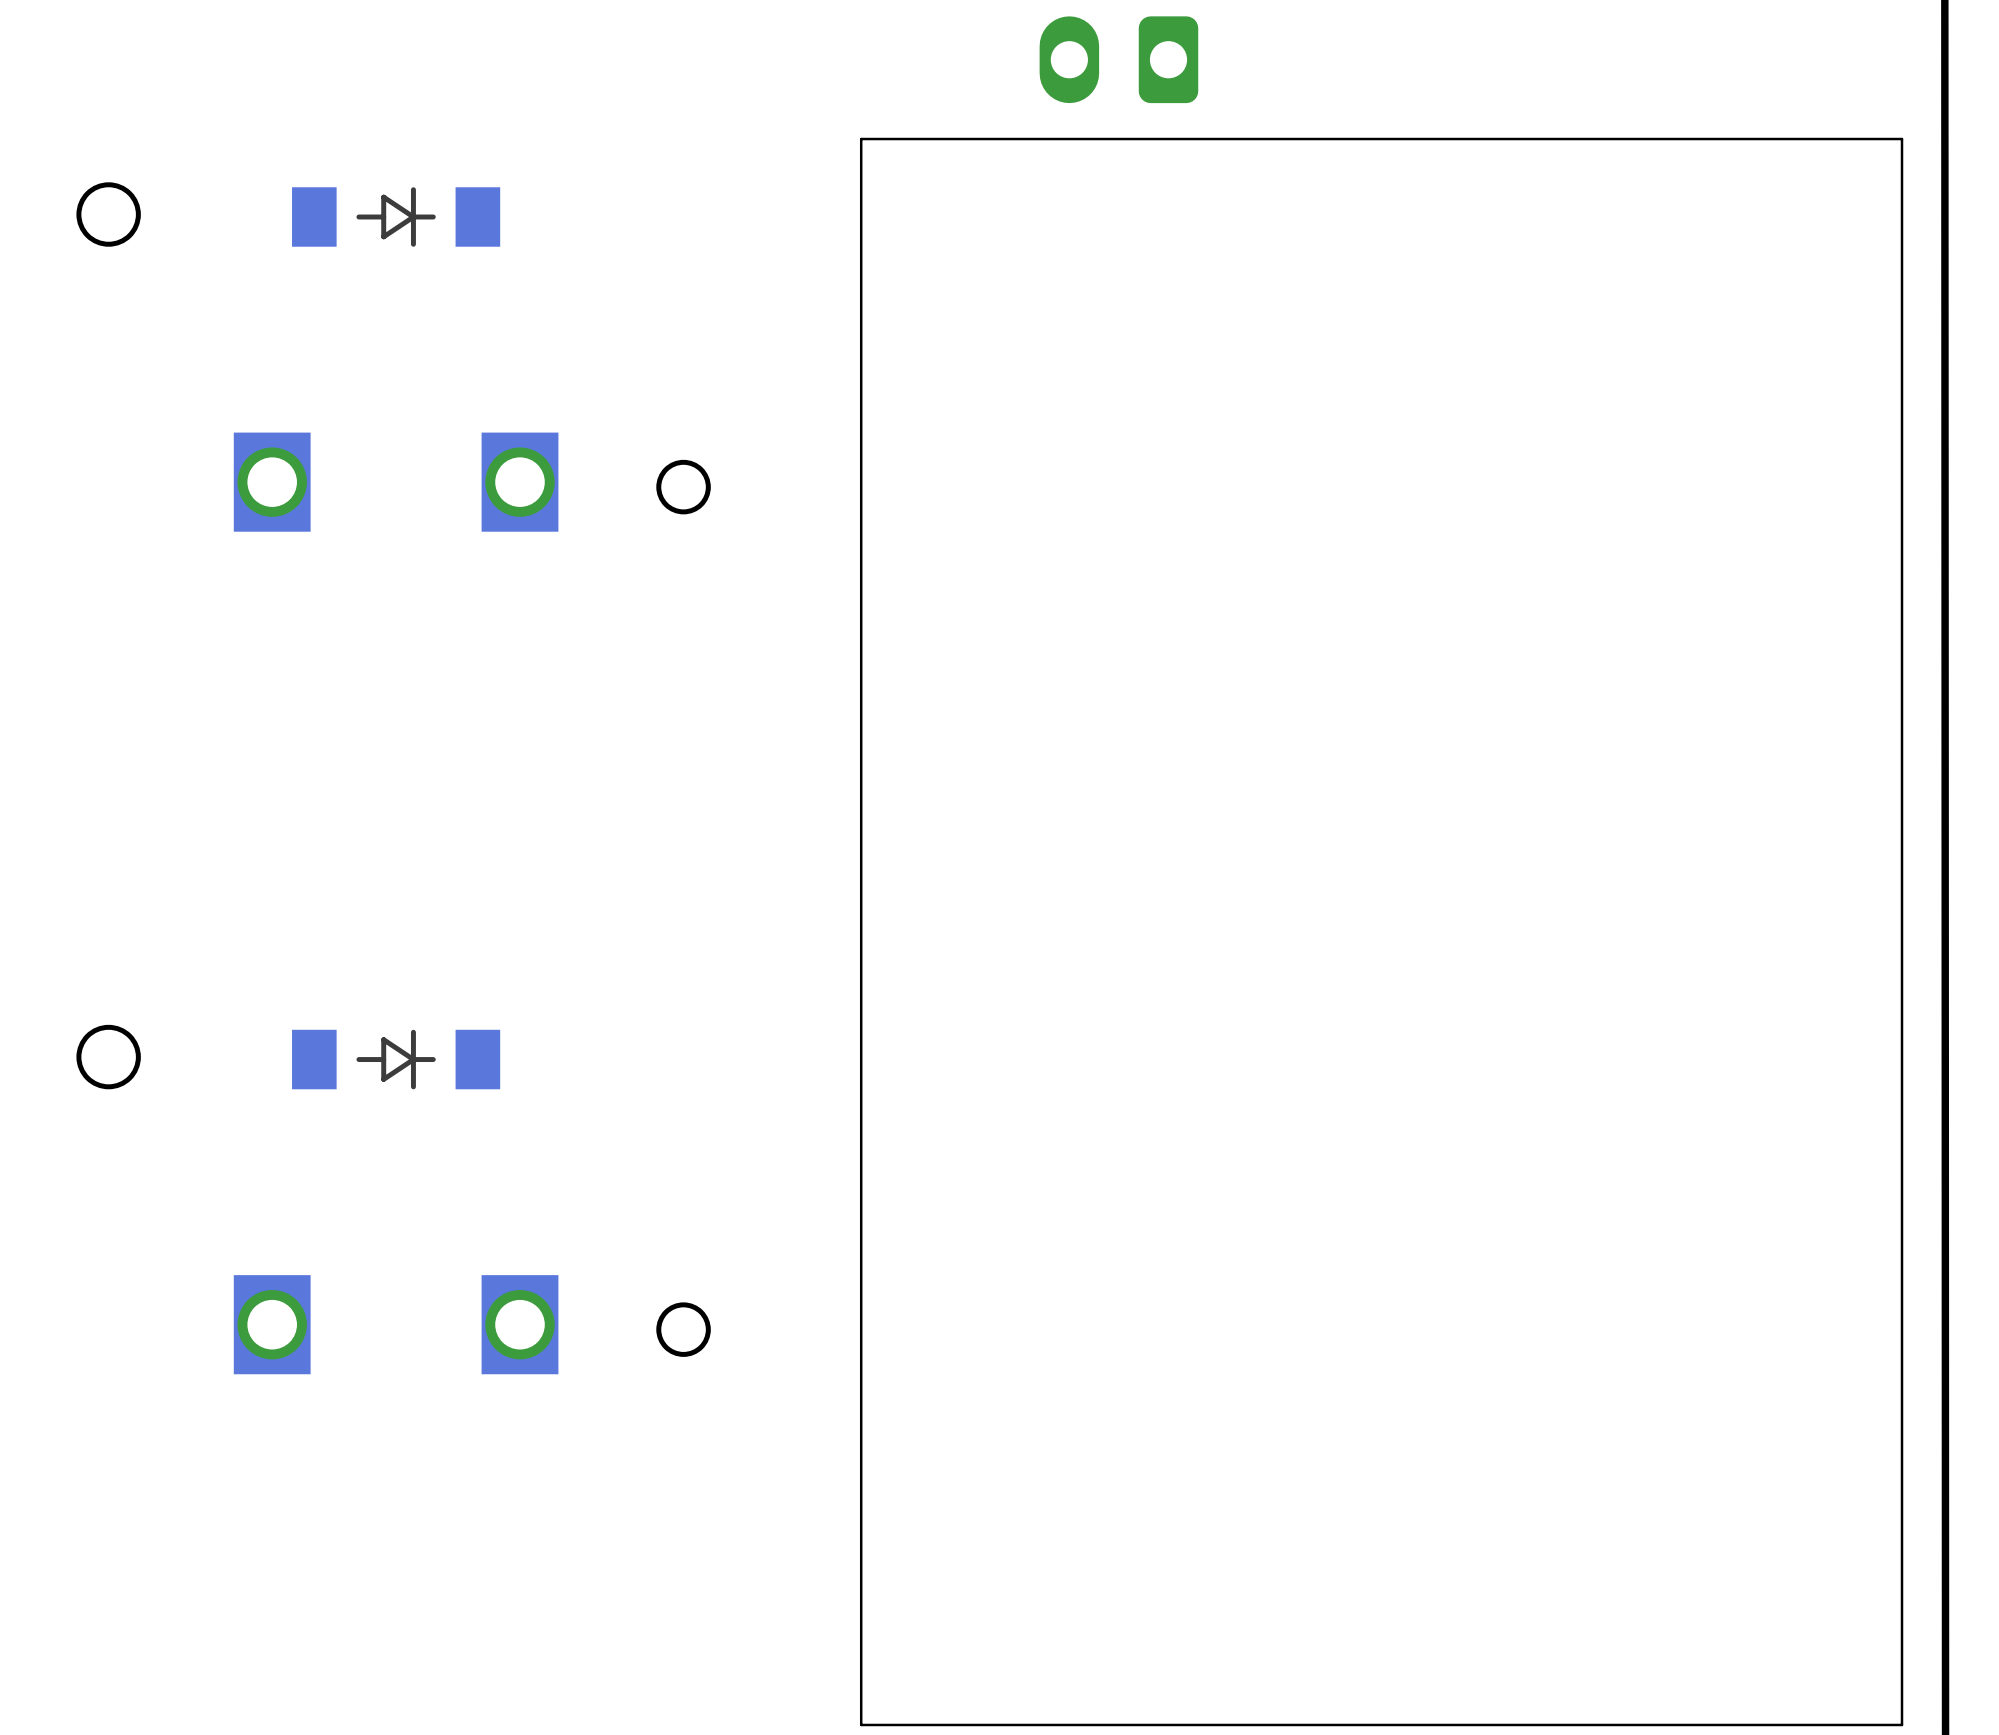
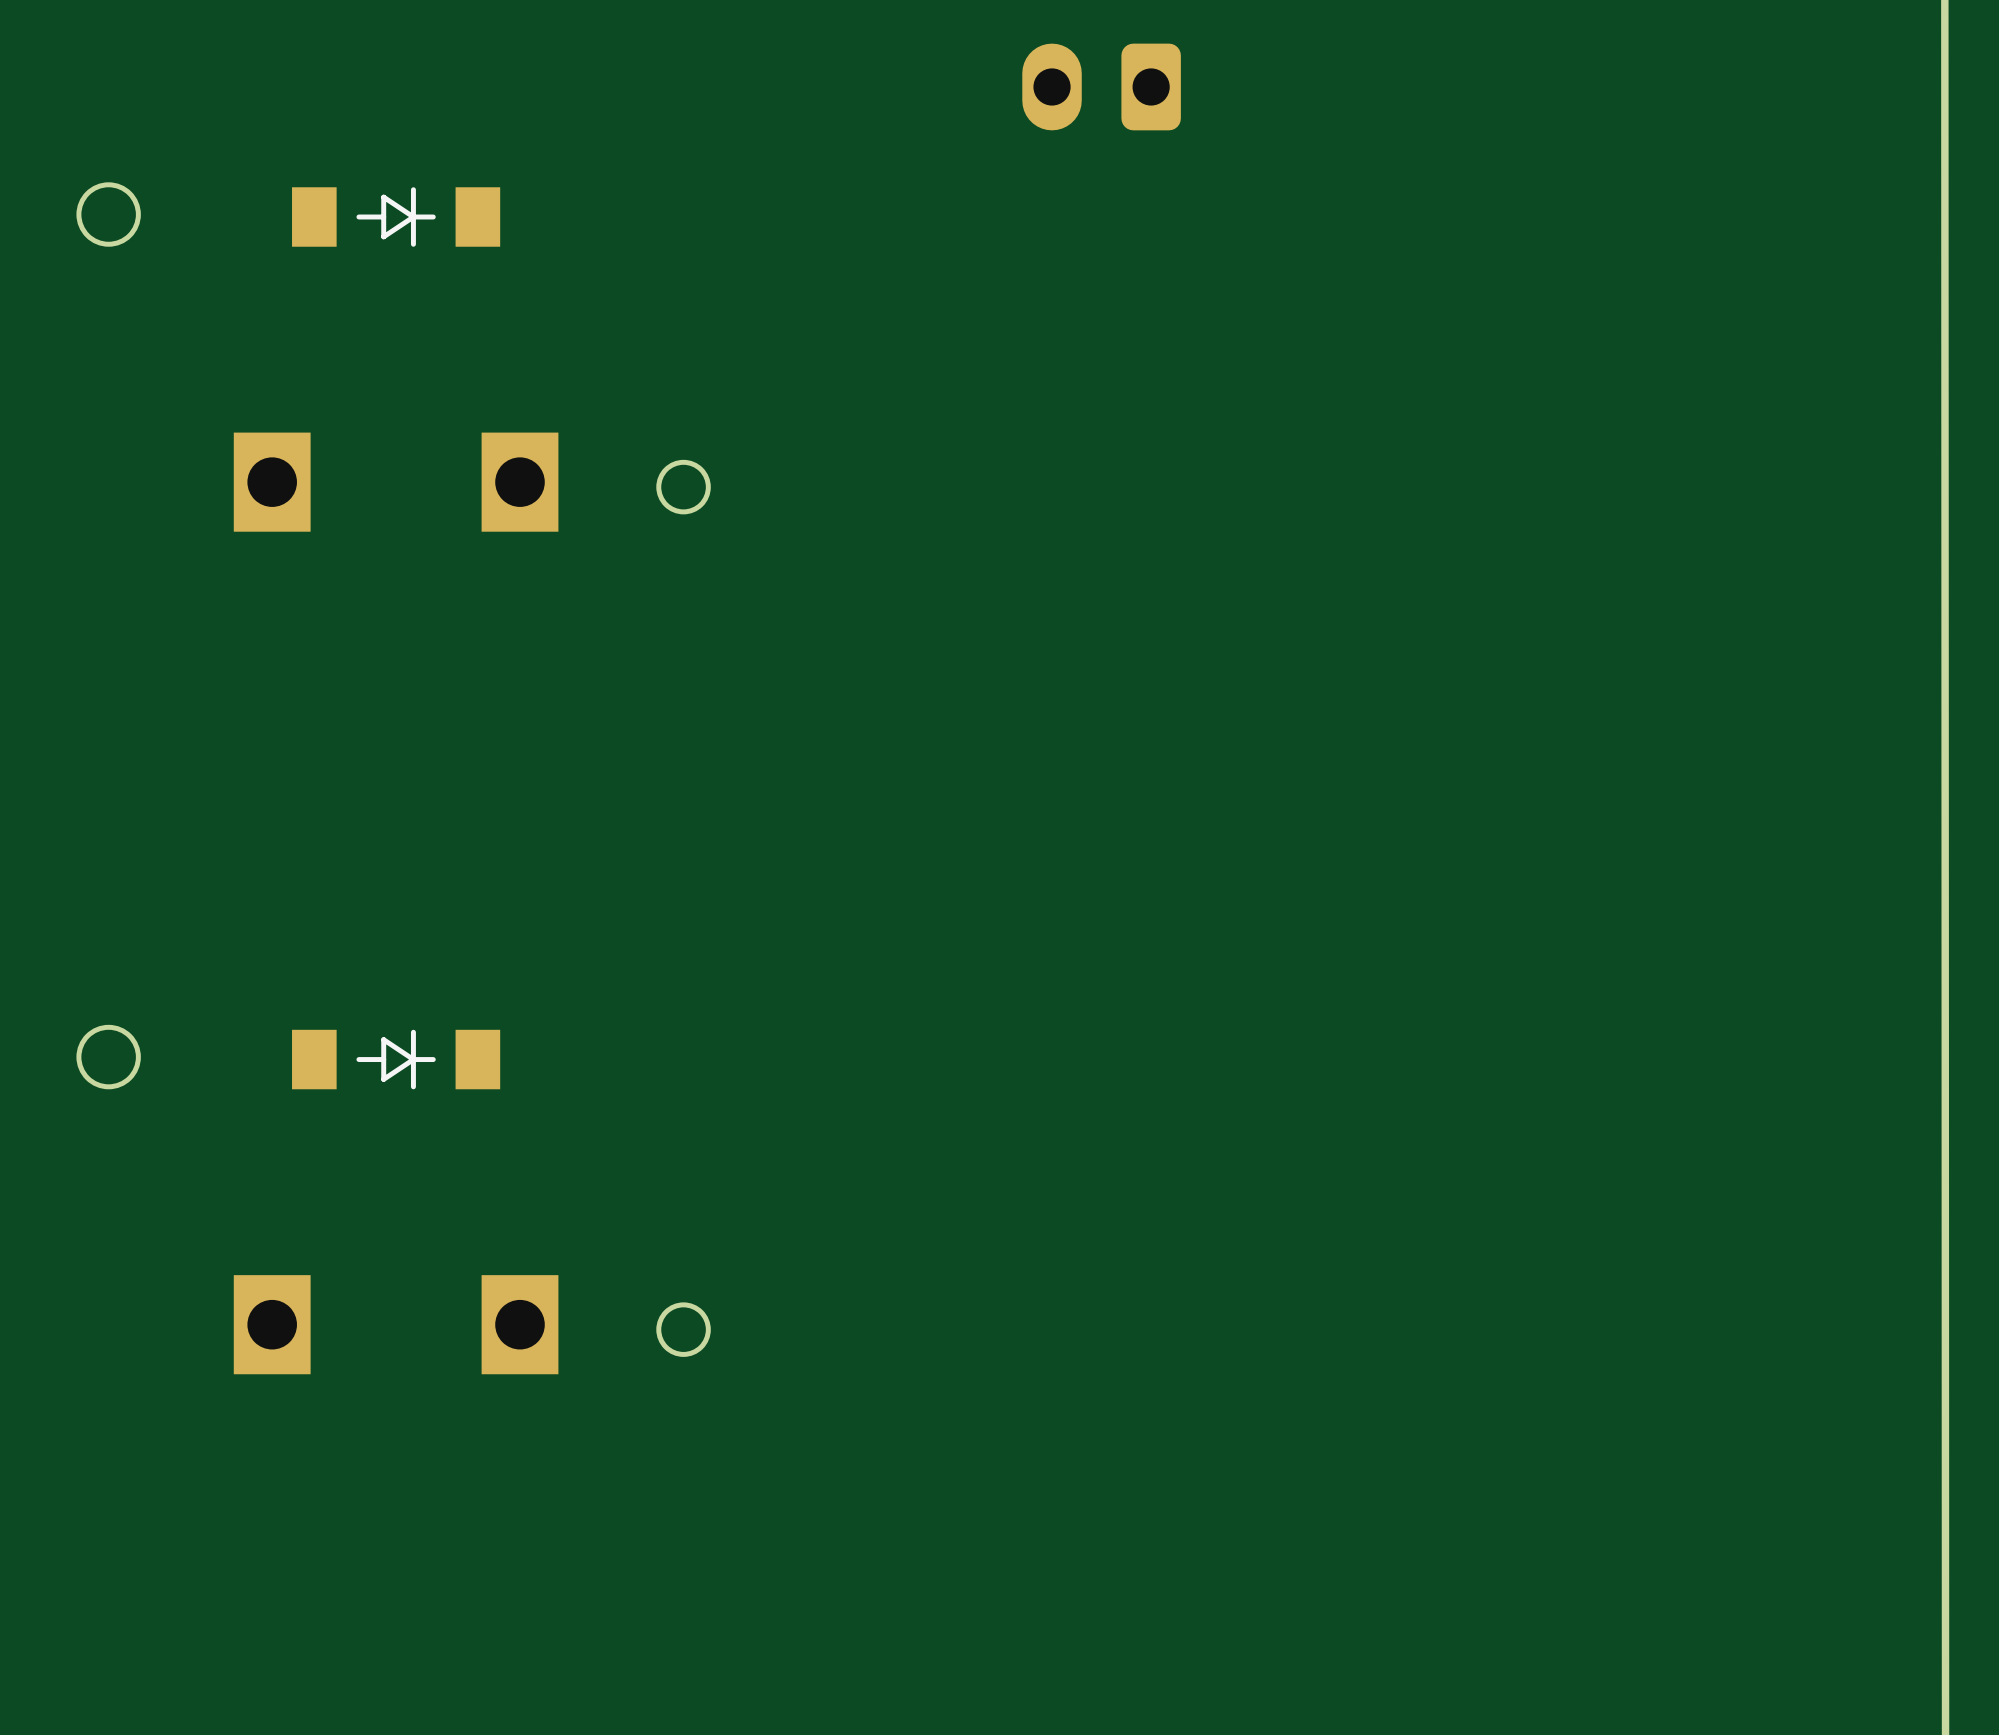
part position: (1118, 59) -> (1101, 86)
board edge: (1902, 139) (861, 139) (861, 1724) (1902, 1724) (1902, 139) -> none

